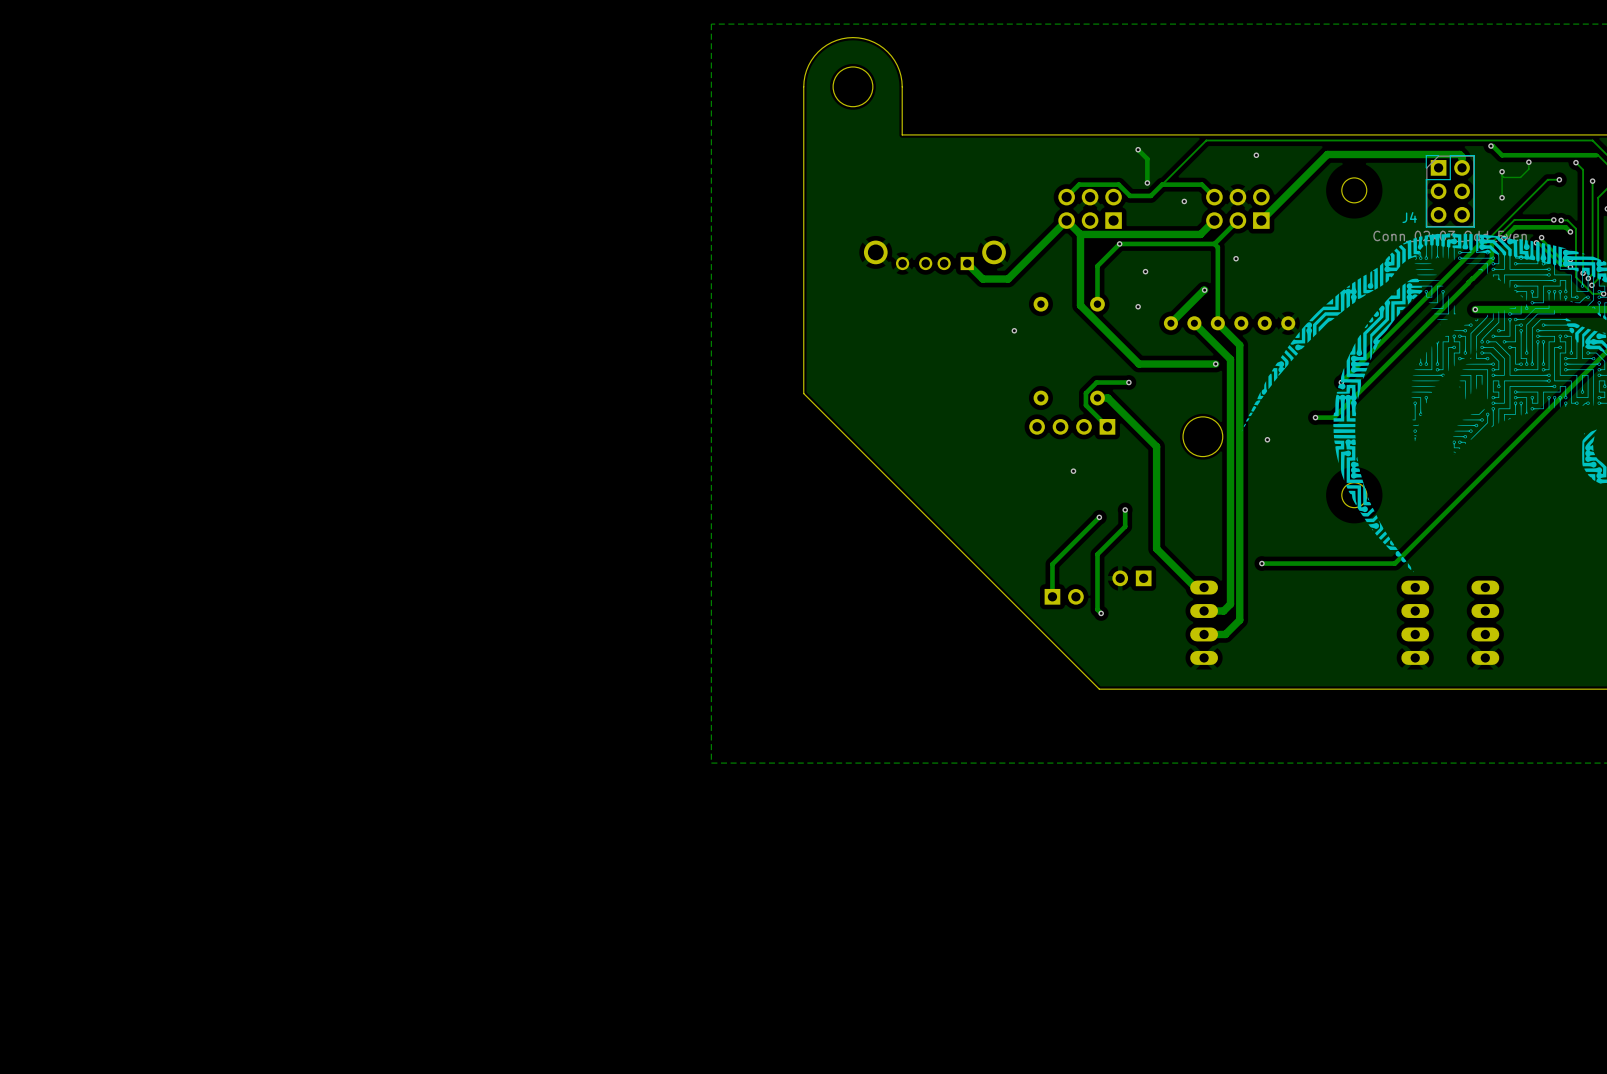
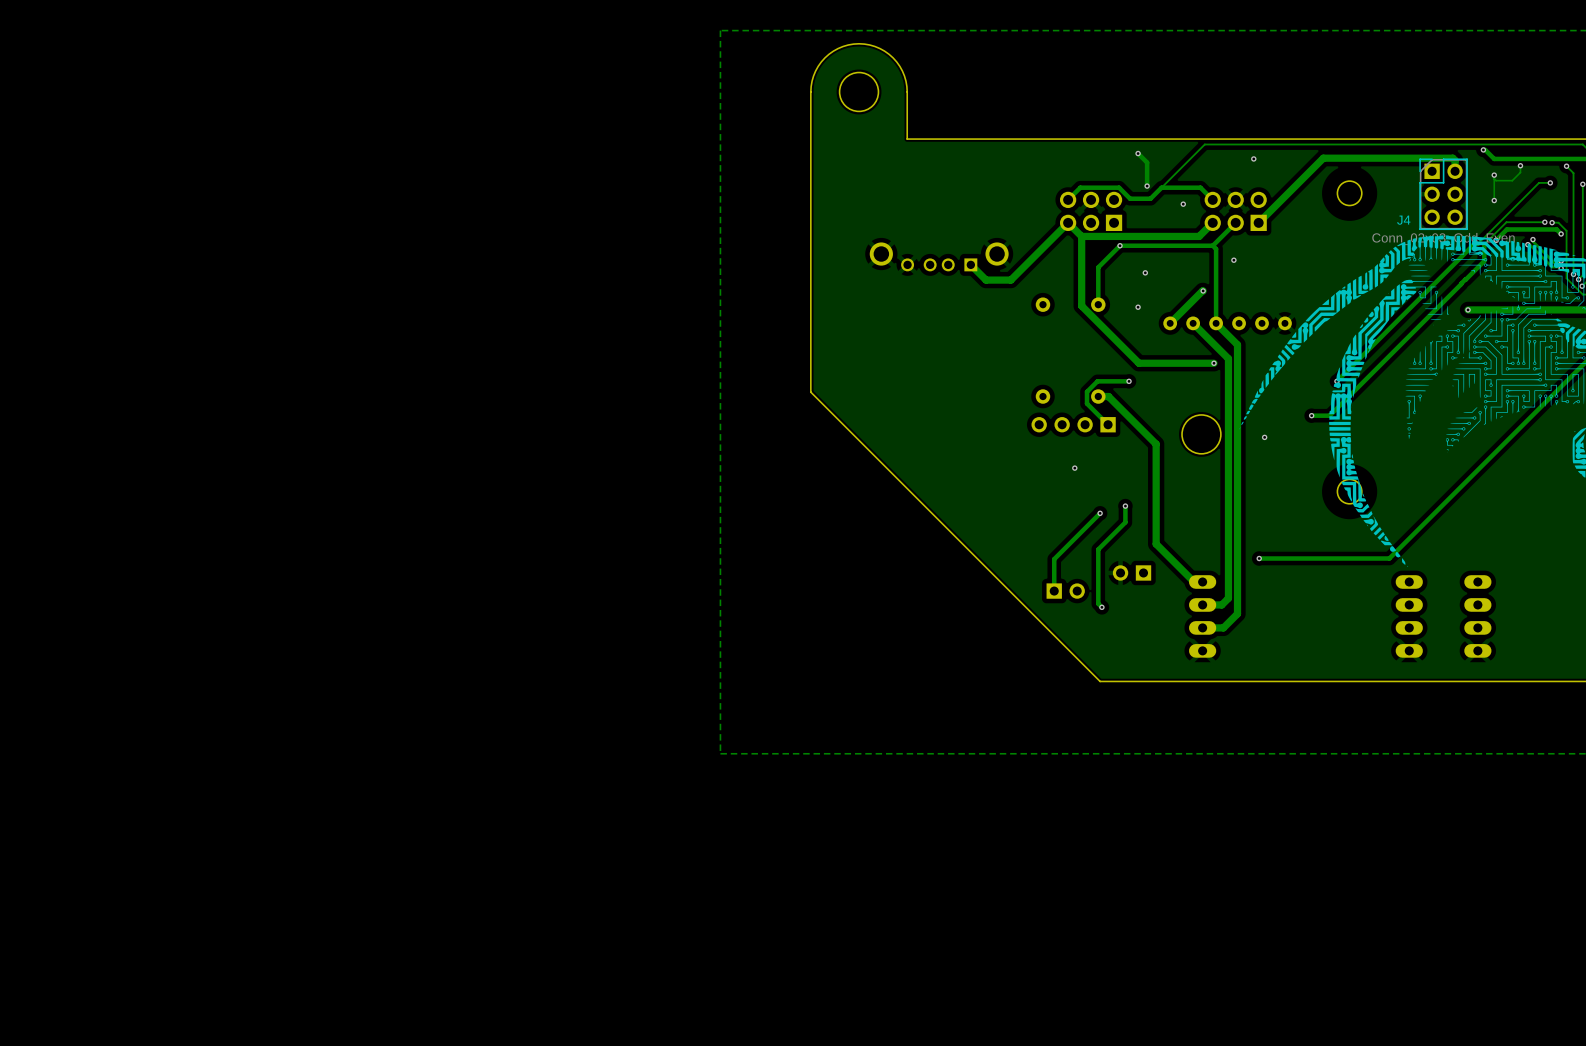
via: (1014, 330) -> none

